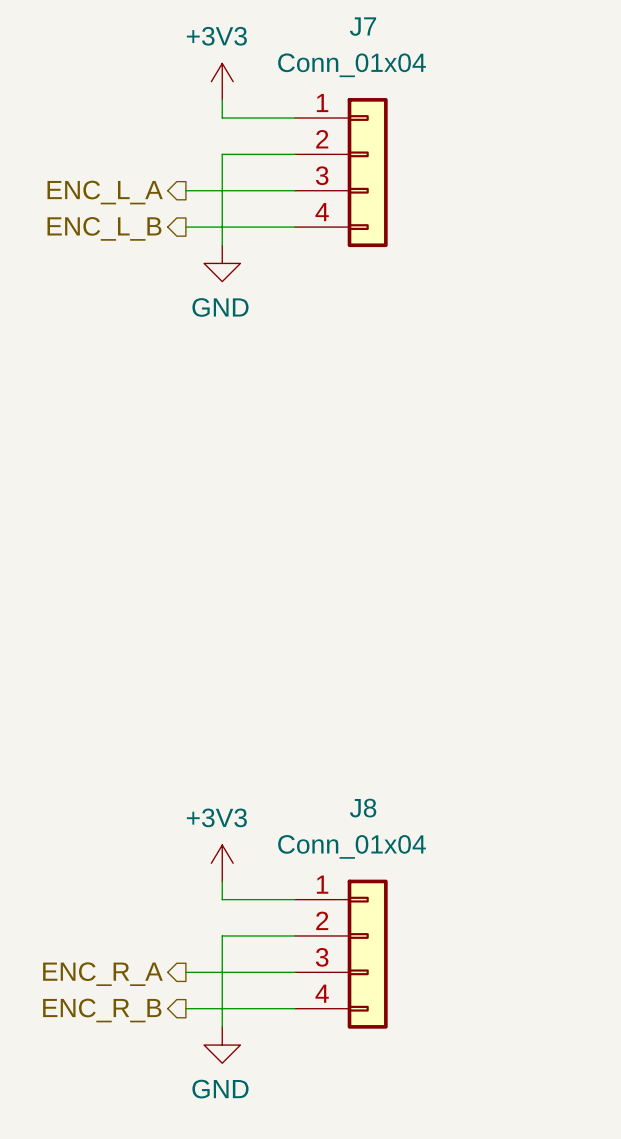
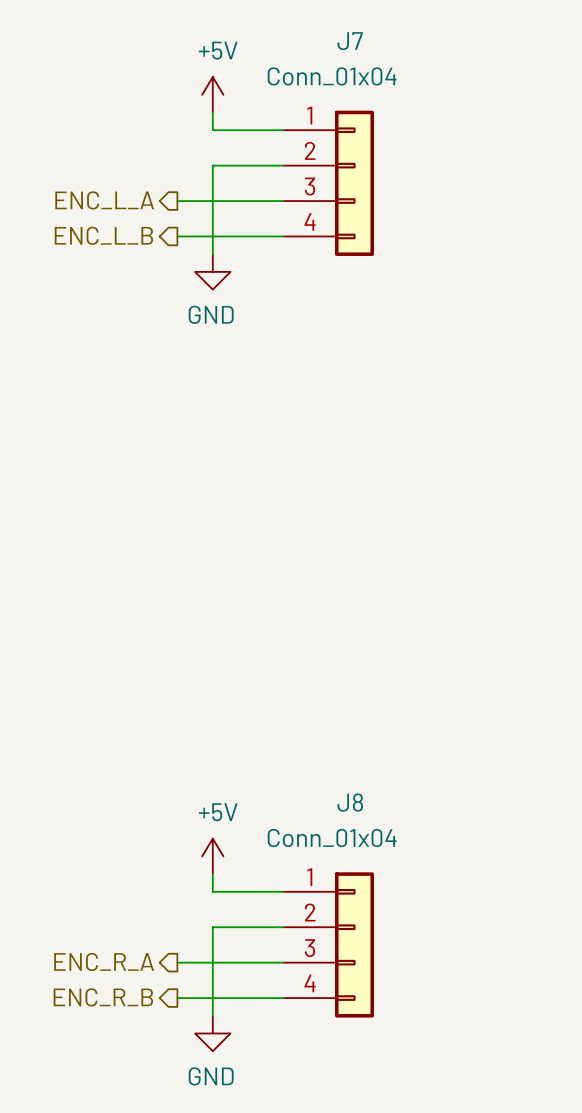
power symbol: +3V3 (222, 81) -> +5V (212, 94)
power symbol: +3V3 (222, 863) -> +5V (212, 856)

